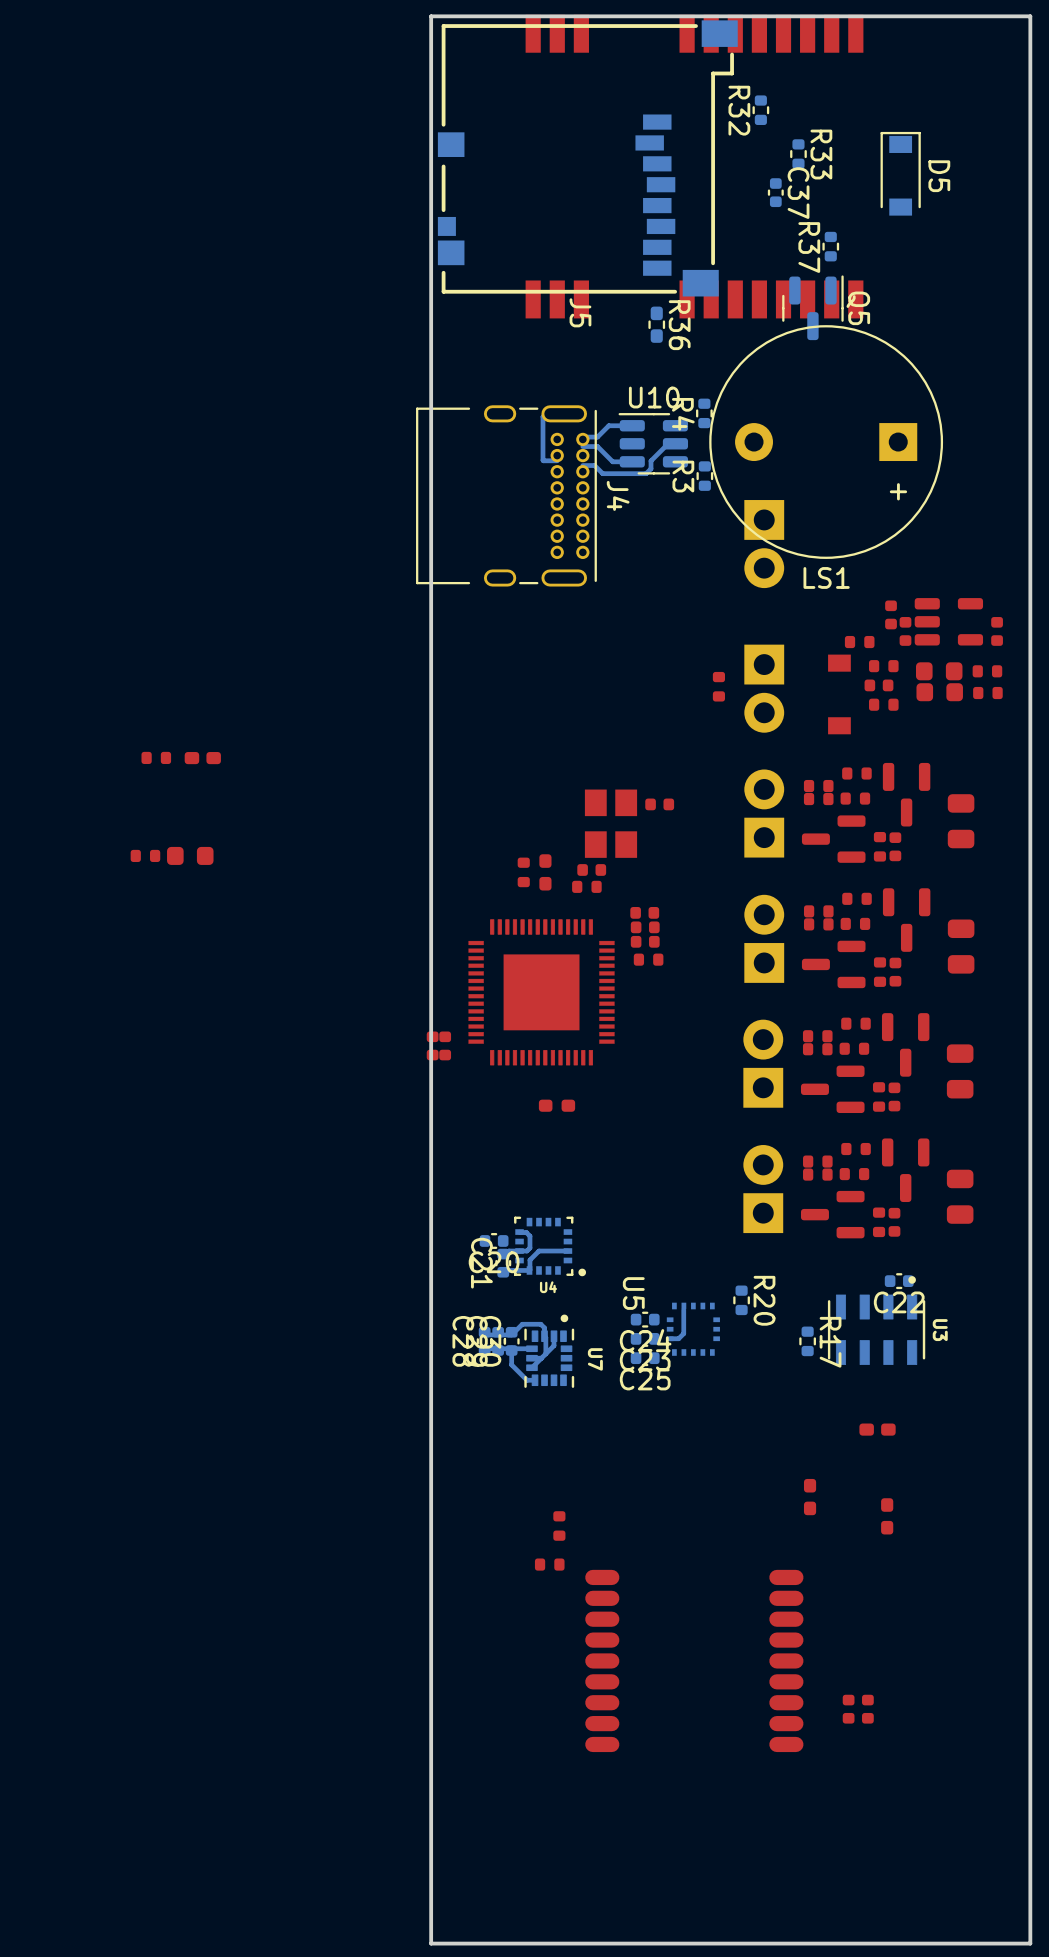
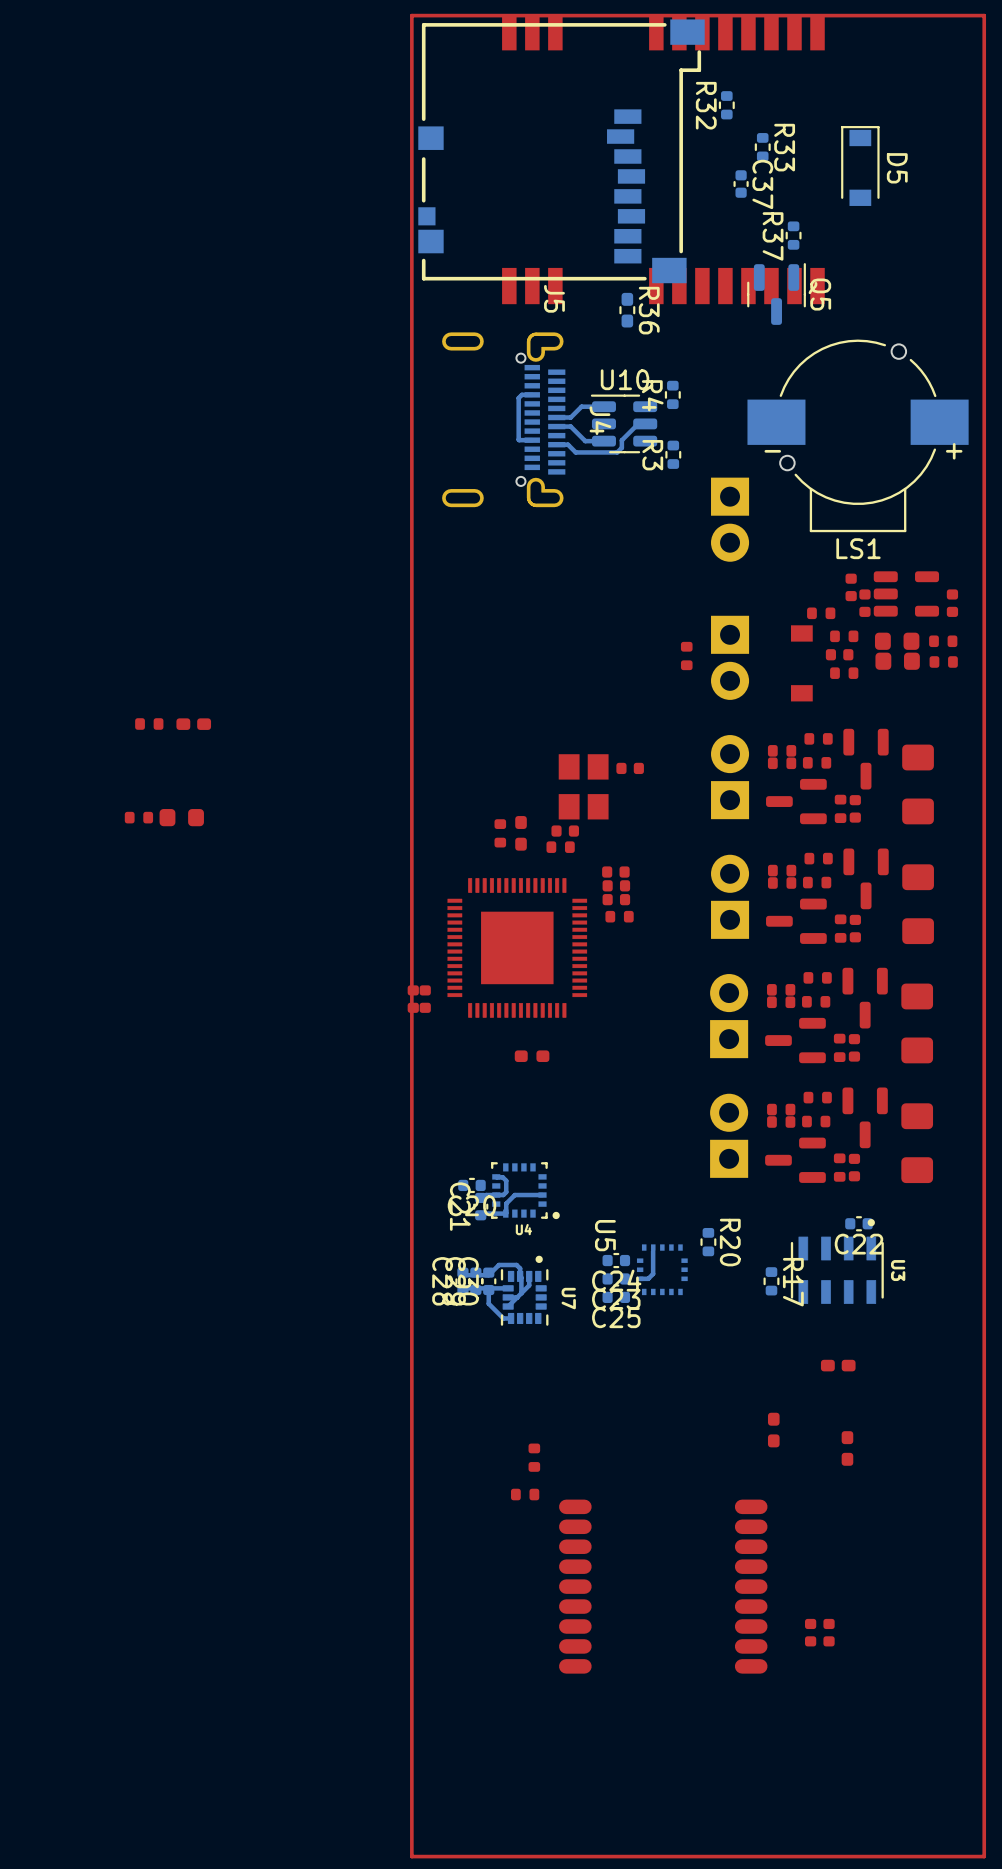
board edge: (1030, 16) (431, 16) (431, 1943) (1030, 1943) (1030, 16) -> none
top track: none -> (984, 15) (411, 15) (411, 1856) (984, 1856) (984, 15)
LS1 footprint: [709, 325, 944, 559] -> [747, 339, 969, 533]
J4 footprint: [416, 405, 597, 587] -> [442, 332, 566, 508]
part footprint: [947, 794, 975, 849] -> [902, 744, 934, 825]
part footprint: [947, 919, 975, 974] -> [902, 864, 934, 945]
part footprint: [946, 1044, 974, 1099] -> [901, 983, 934, 1064]
part footprint: [946, 1169, 974, 1224] -> [901, 1103, 934, 1184]

